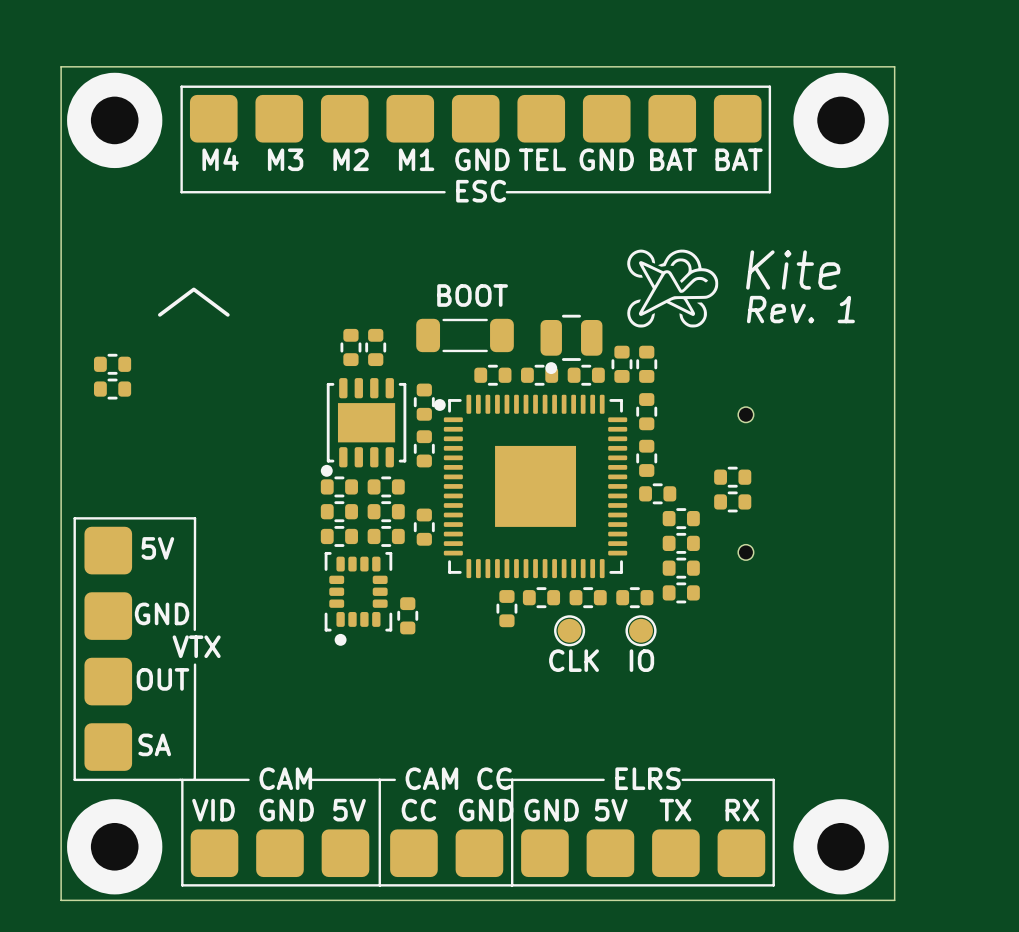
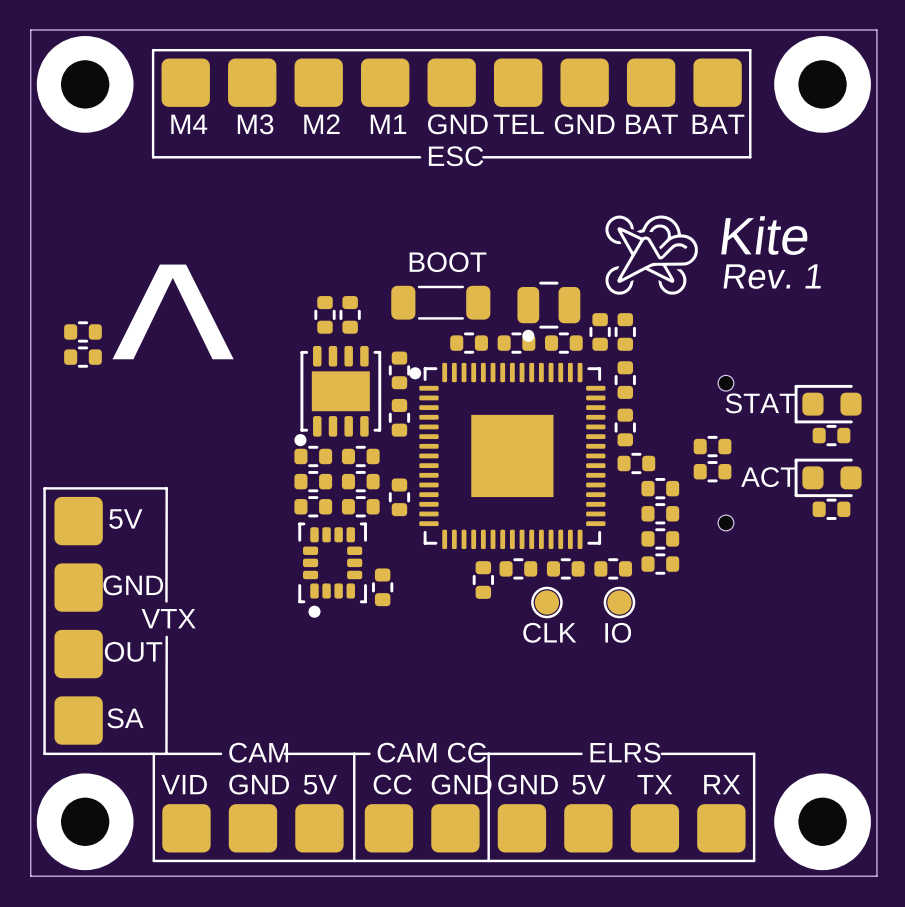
text: none -> STAT (760, 403)
part: none -> (828, 404)
part: none -> (831, 435)
text: none -> ACT (768, 477)
part: none -> (828, 477)
part: none -> (831, 509)

